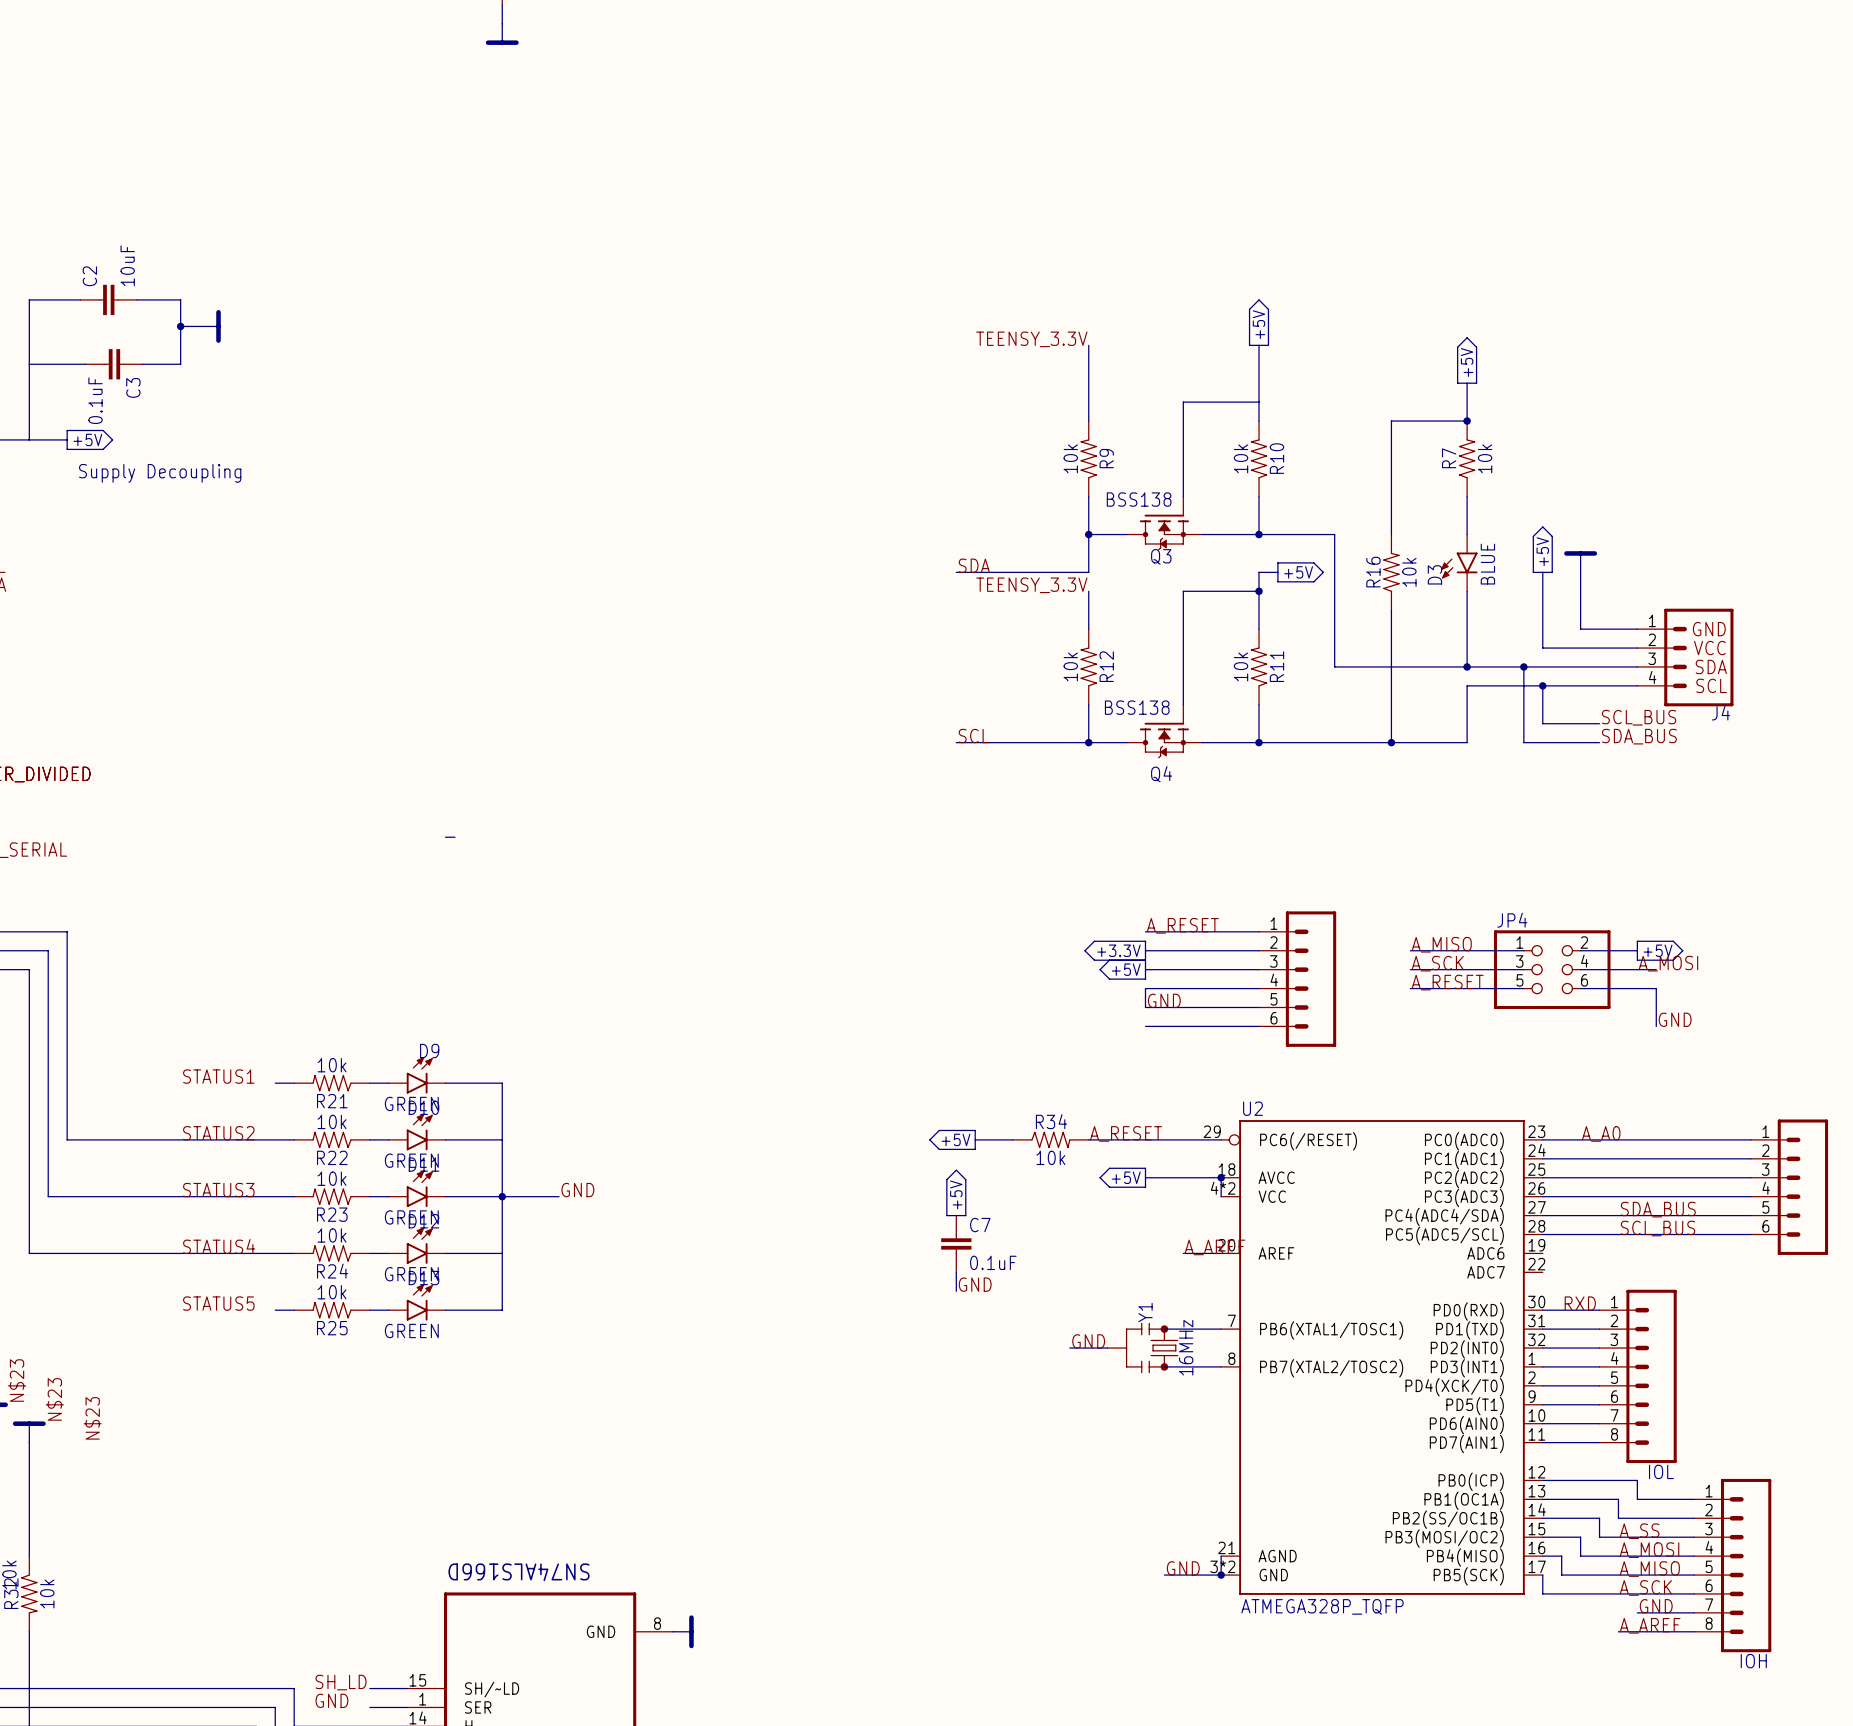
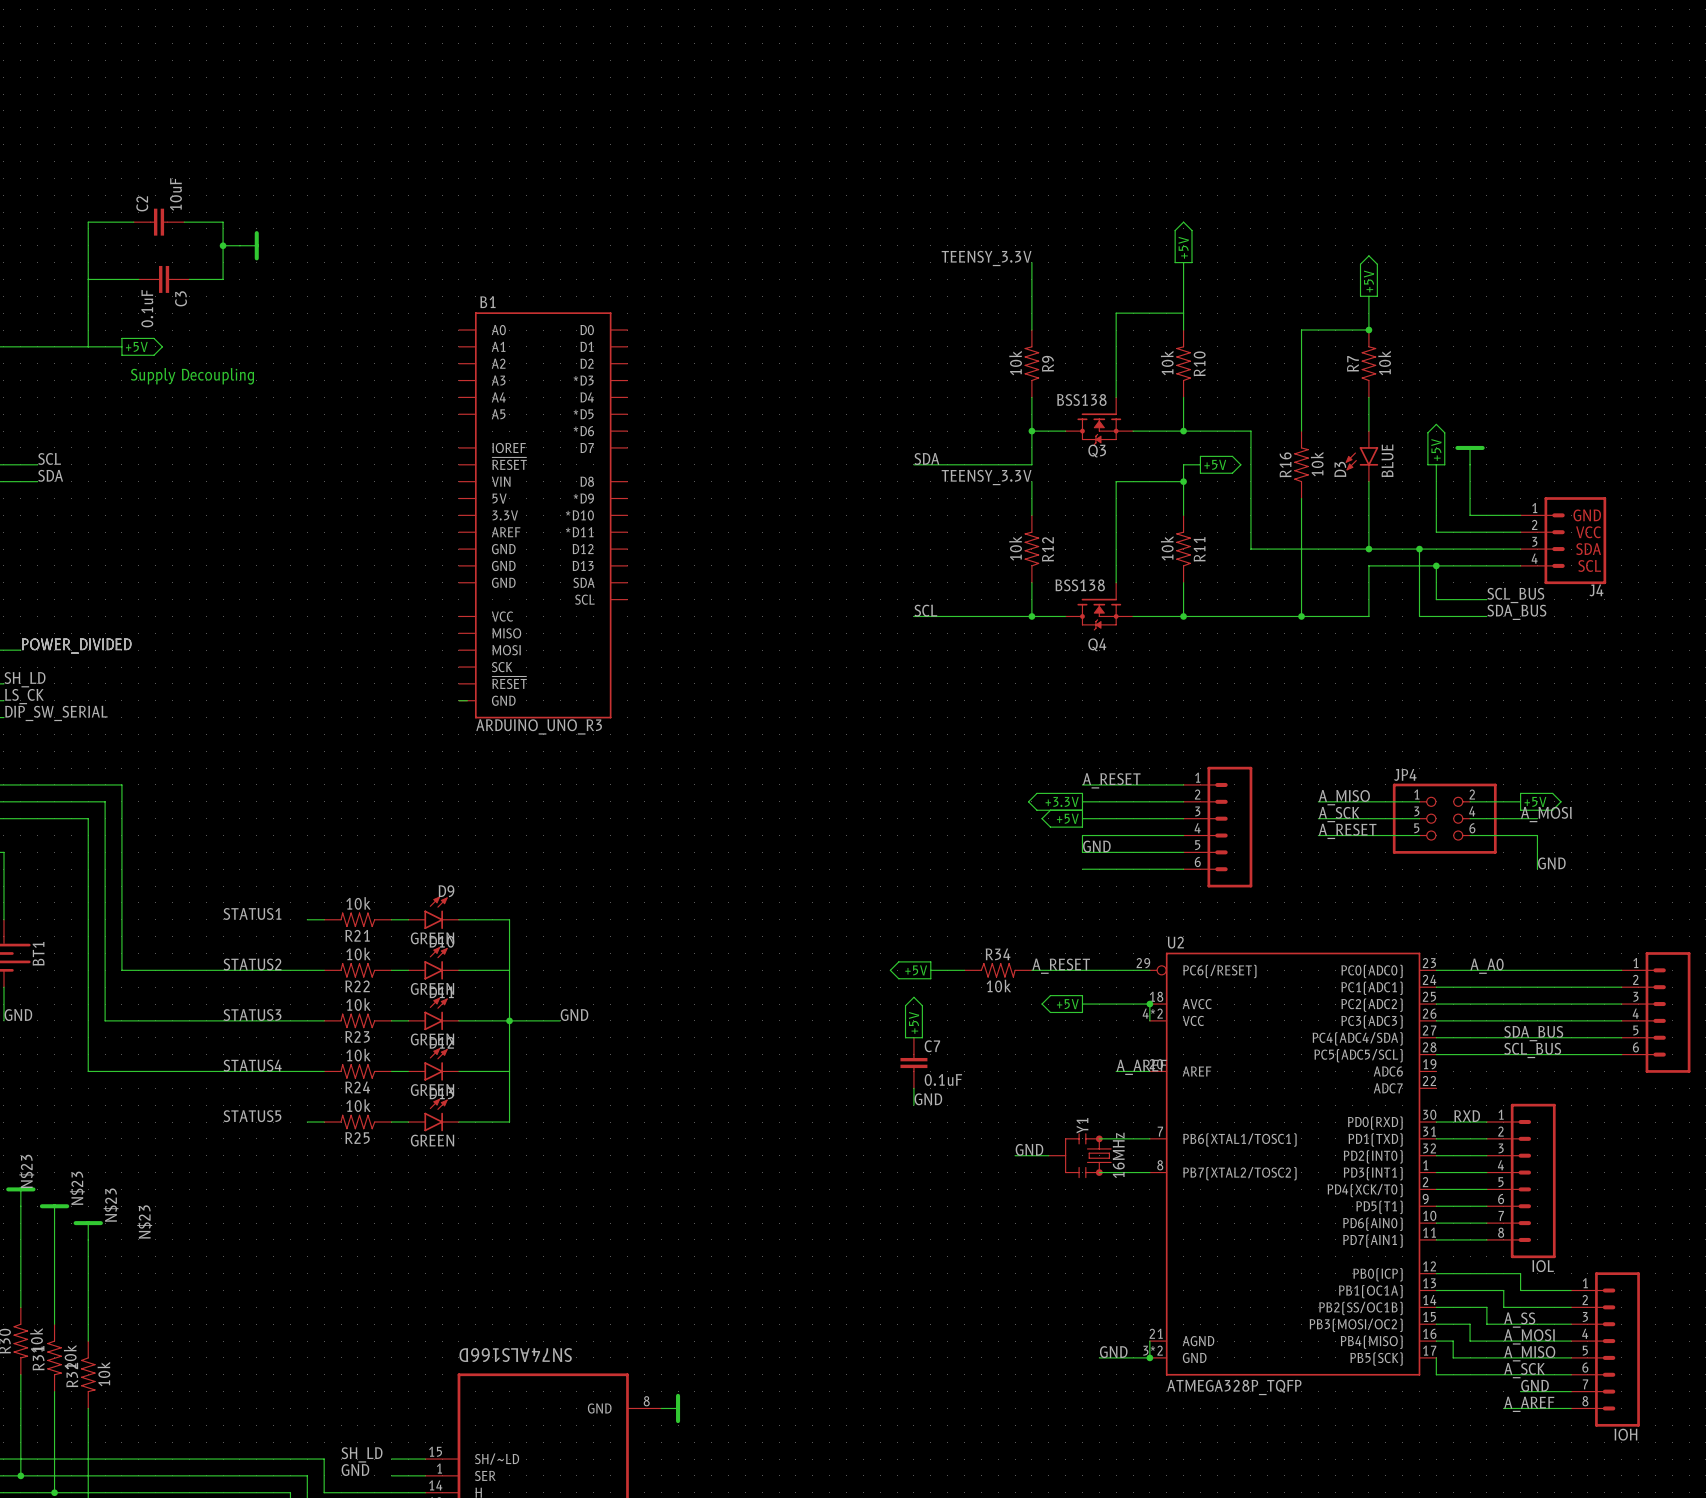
B1: none -> ARDUINO_UNO_R3 (543, 515)

